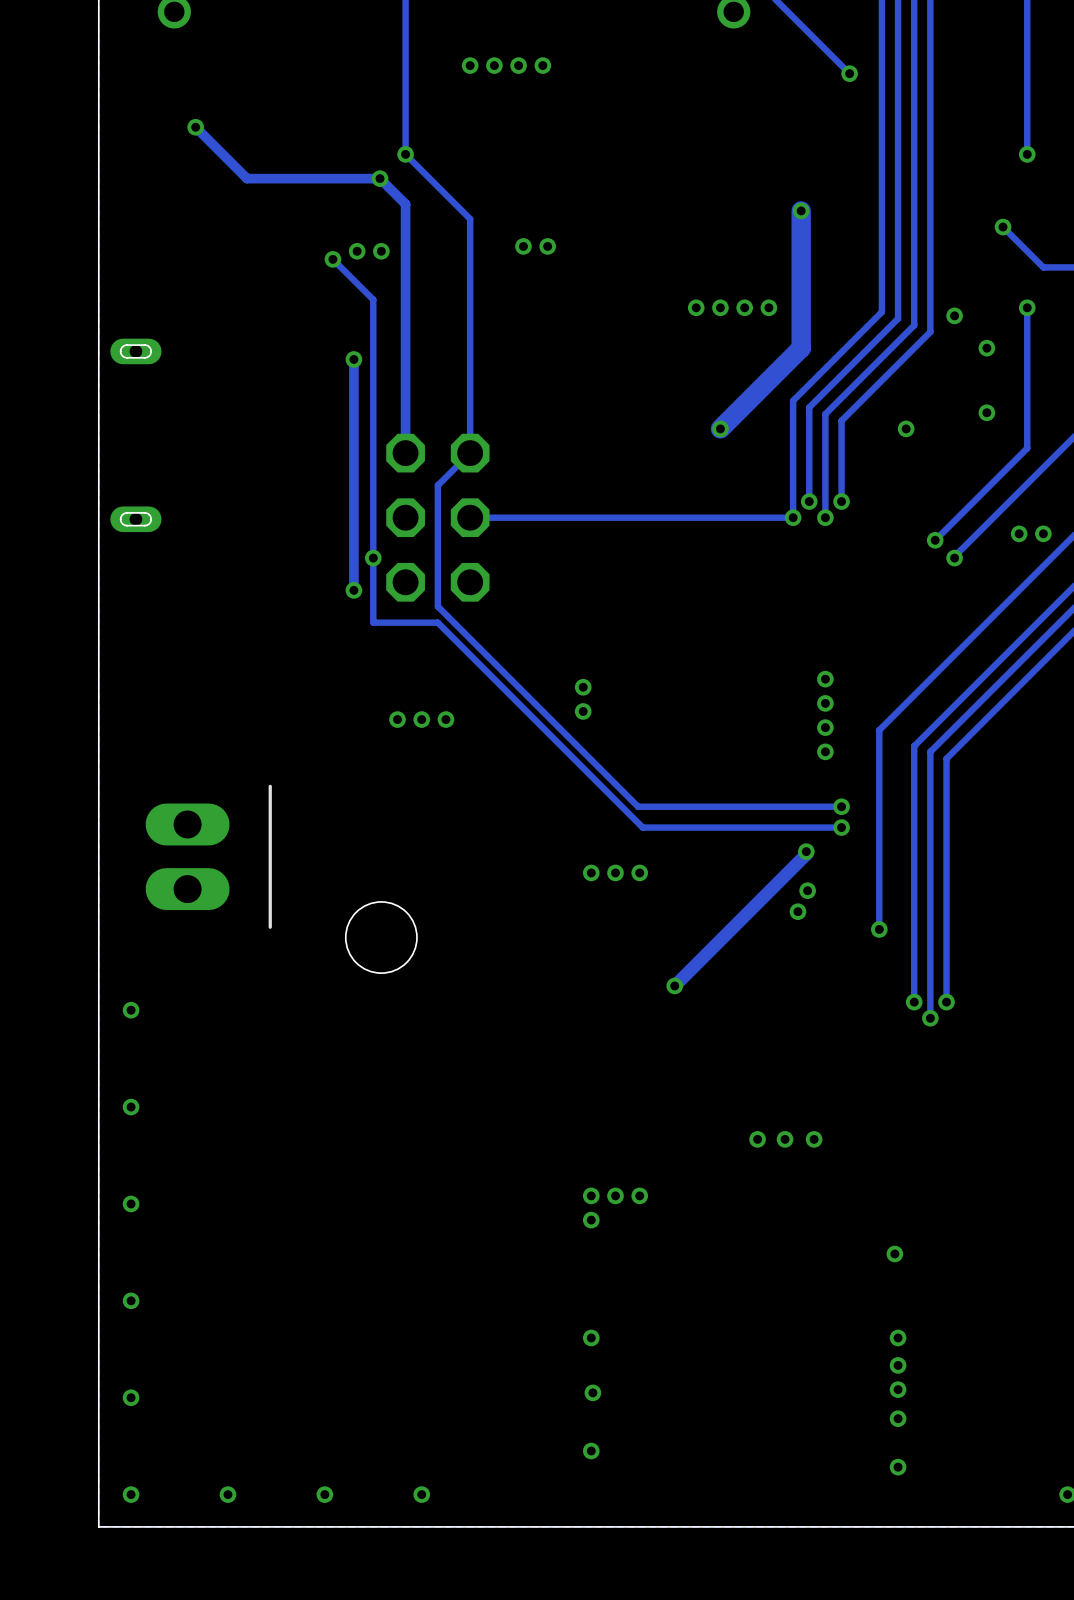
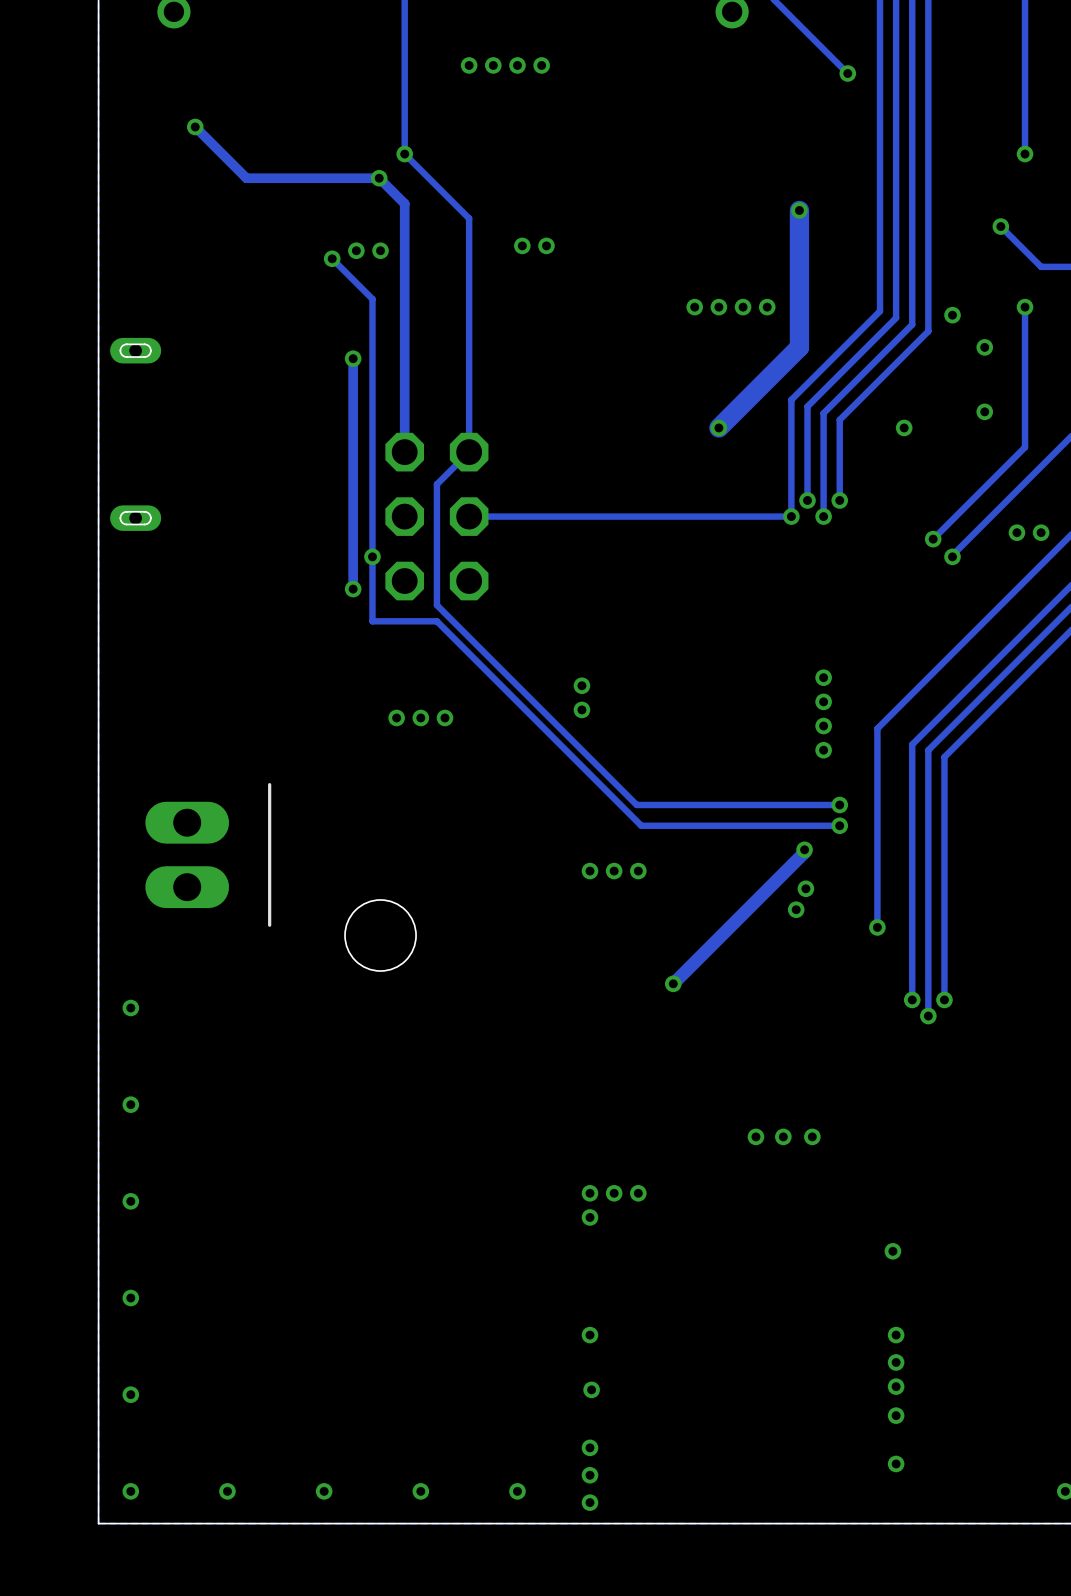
via: none -> (589, 1475)
via: none -> (517, 1491)
via: none -> (589, 1502)

